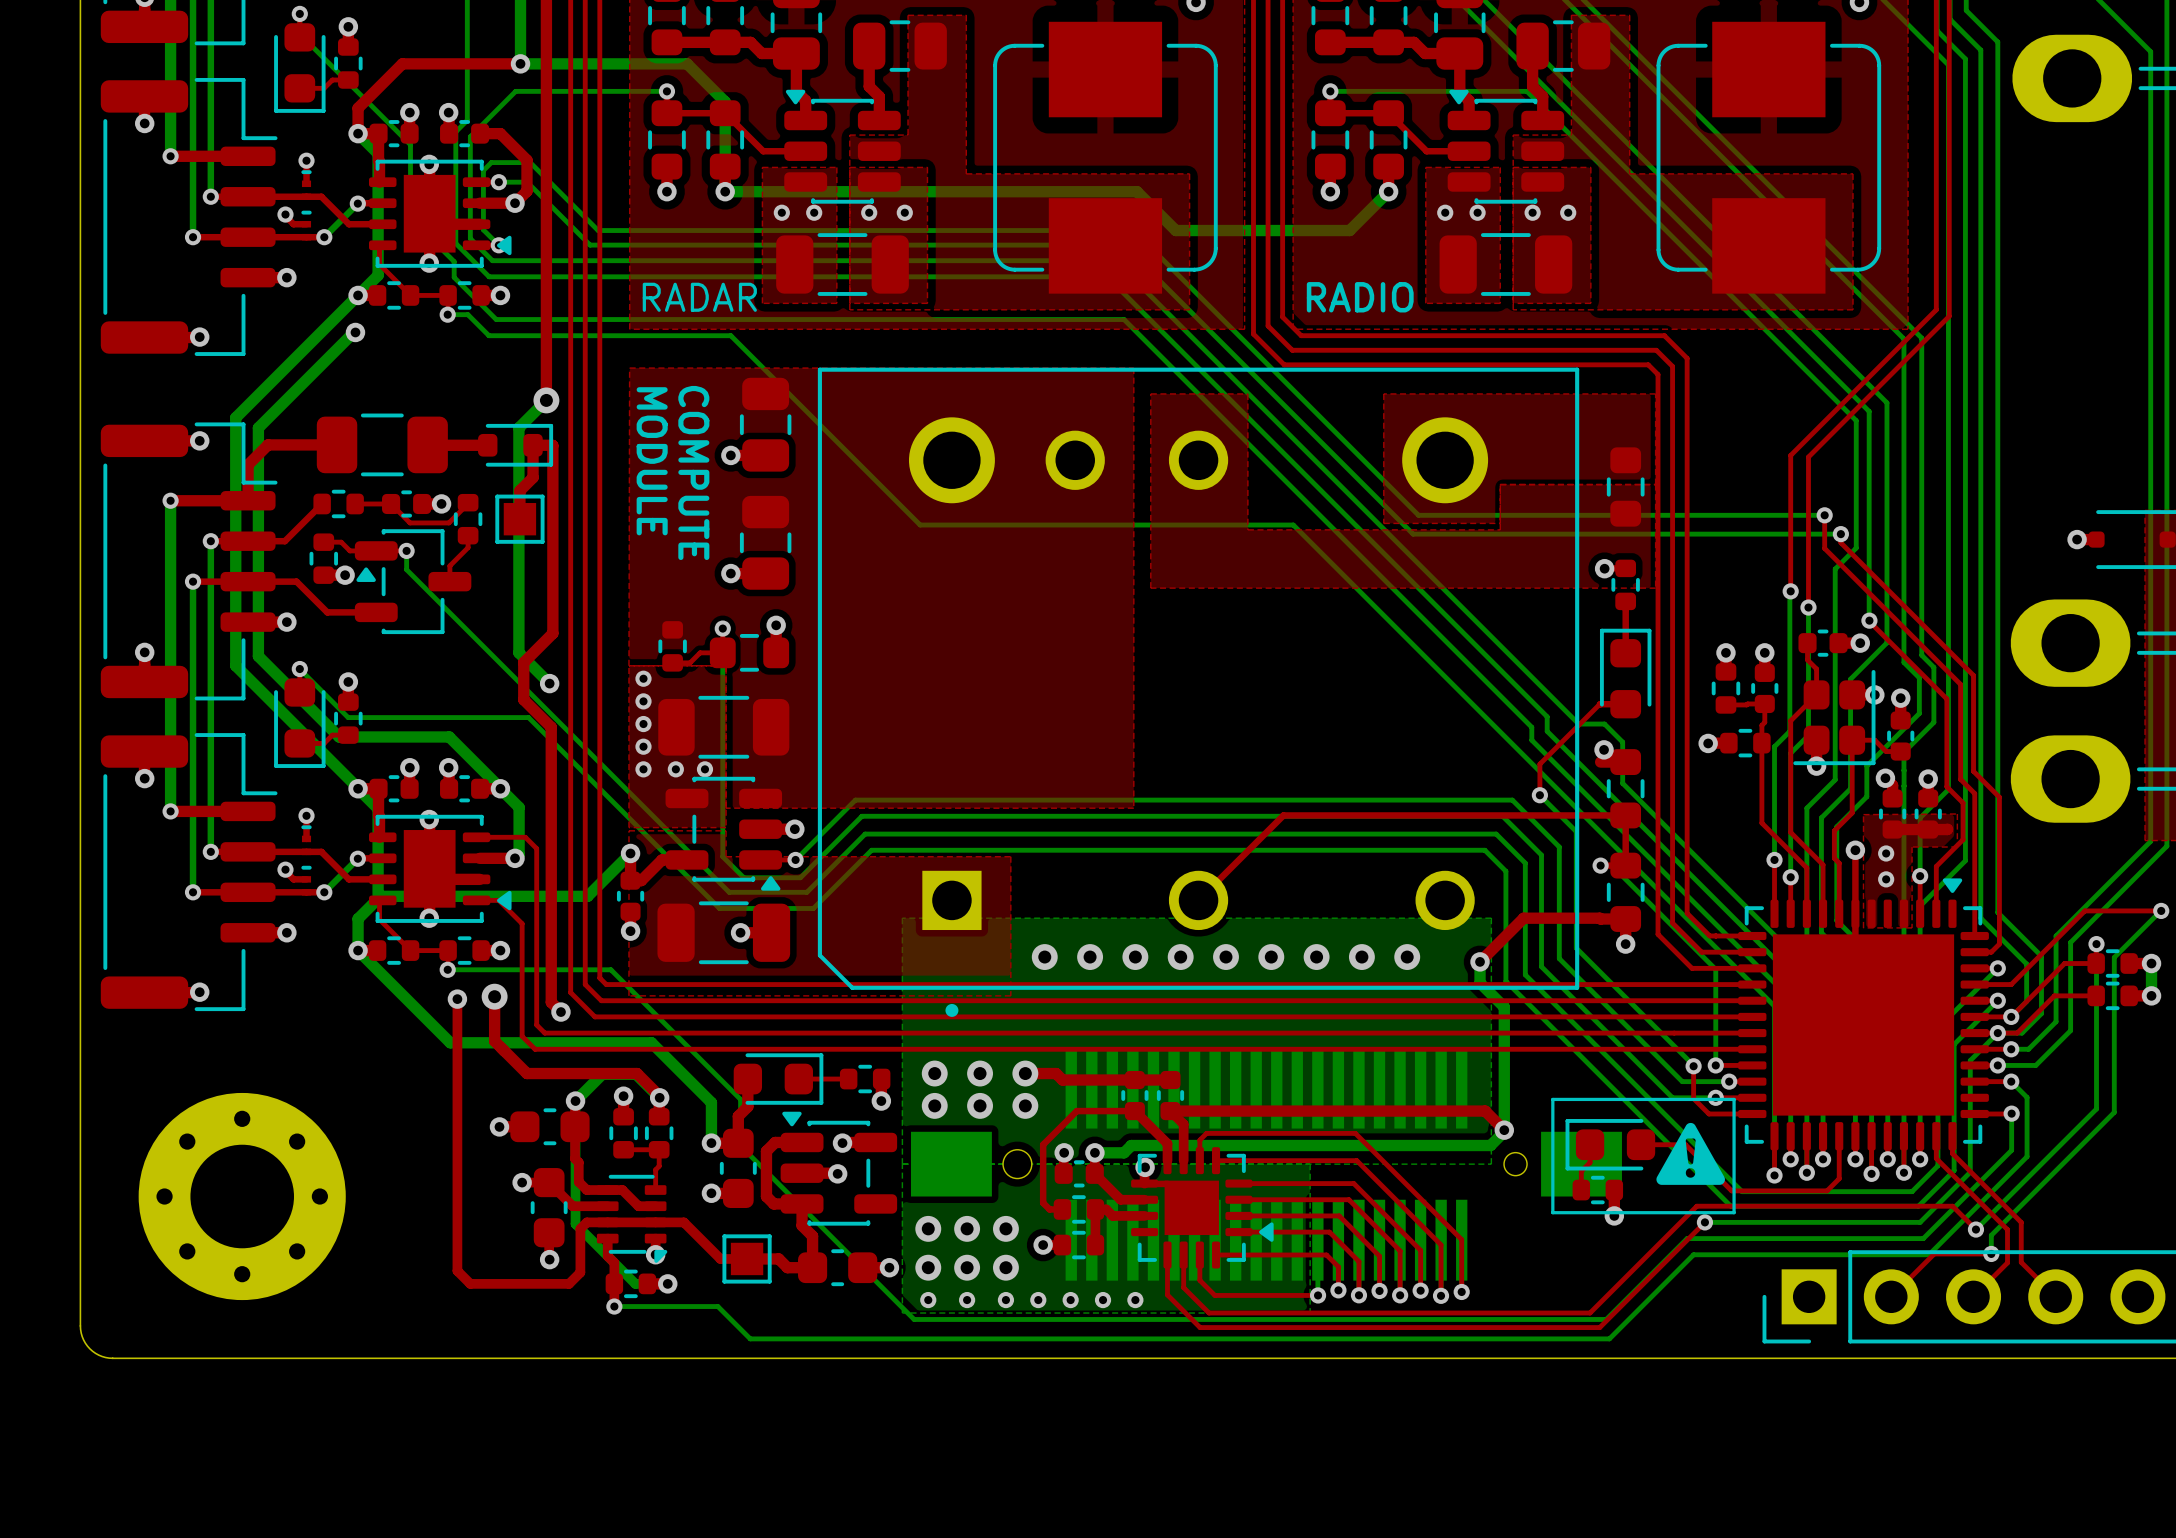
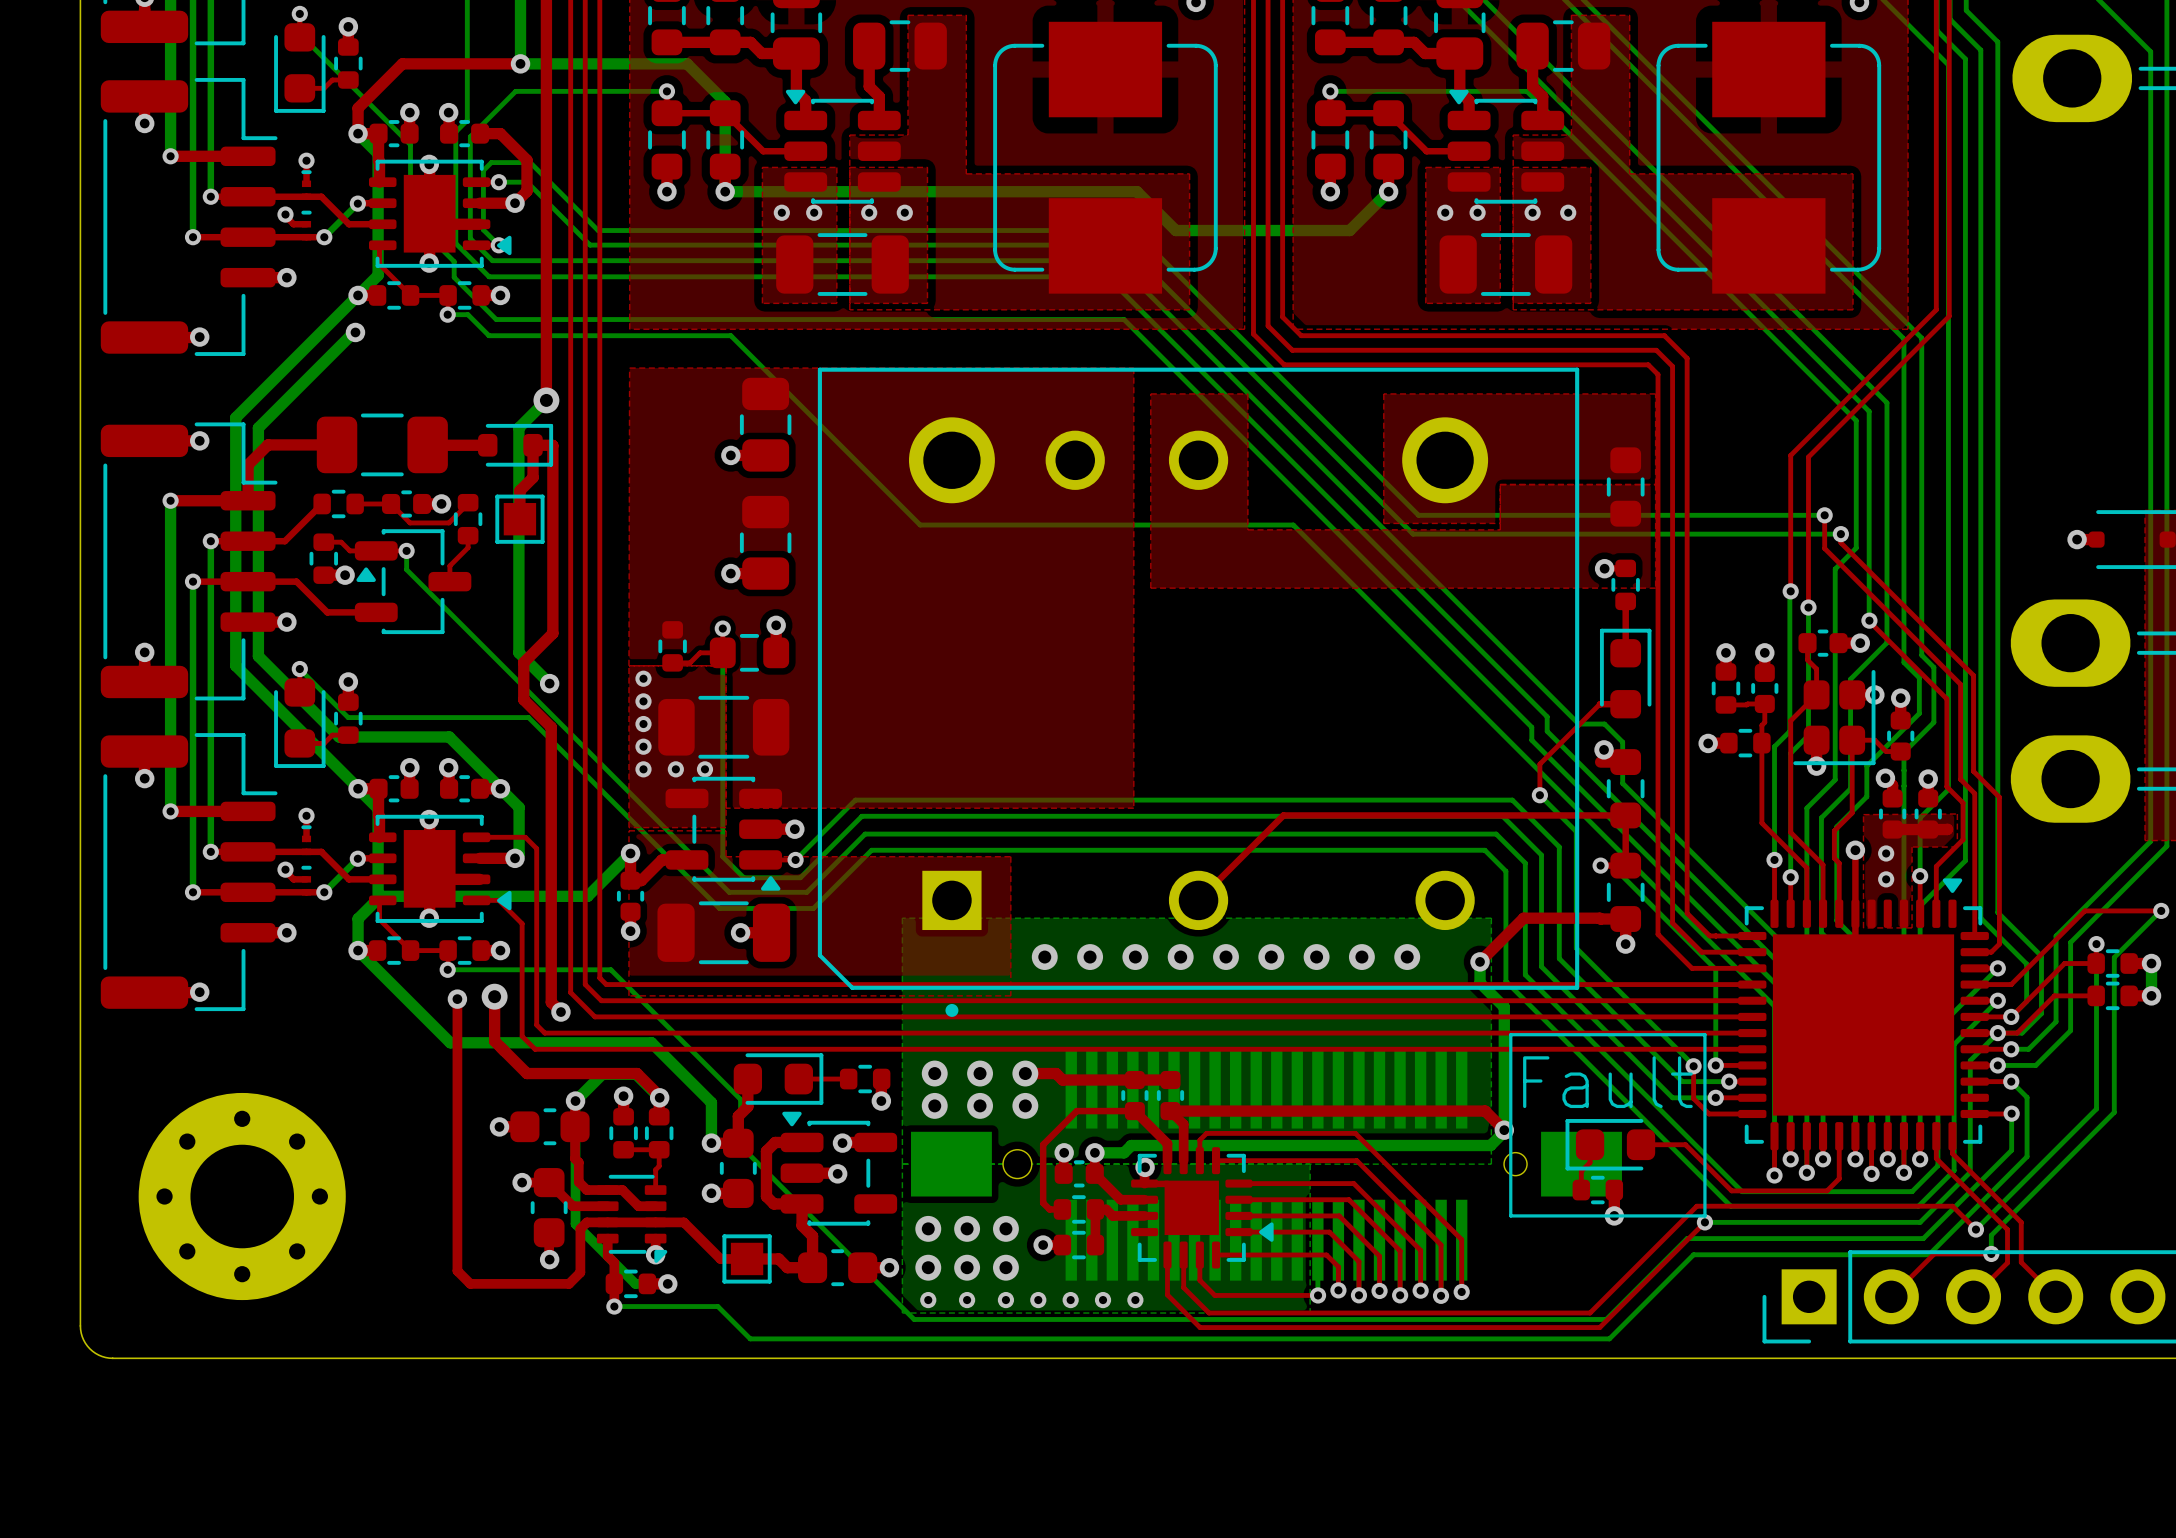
text: RADAR (699, 297) -> none
text: RADIO (1360, 297) -> none
text: MODULE (652, 461) -> none
text: COMPUTE (693, 472) -> none
line: none -> (1510, 1034) (1704, 1034) (1704, 1215) (1510, 1215) (1510, 1034)
text: none -> Fault (1607, 1082)
line: (1552, 1099) (1734, 1099) (1734, 1212) (1552, 1212) (1552, 1099) -> none
drawing: [1656, 1122, 1725, 1185] -> none

